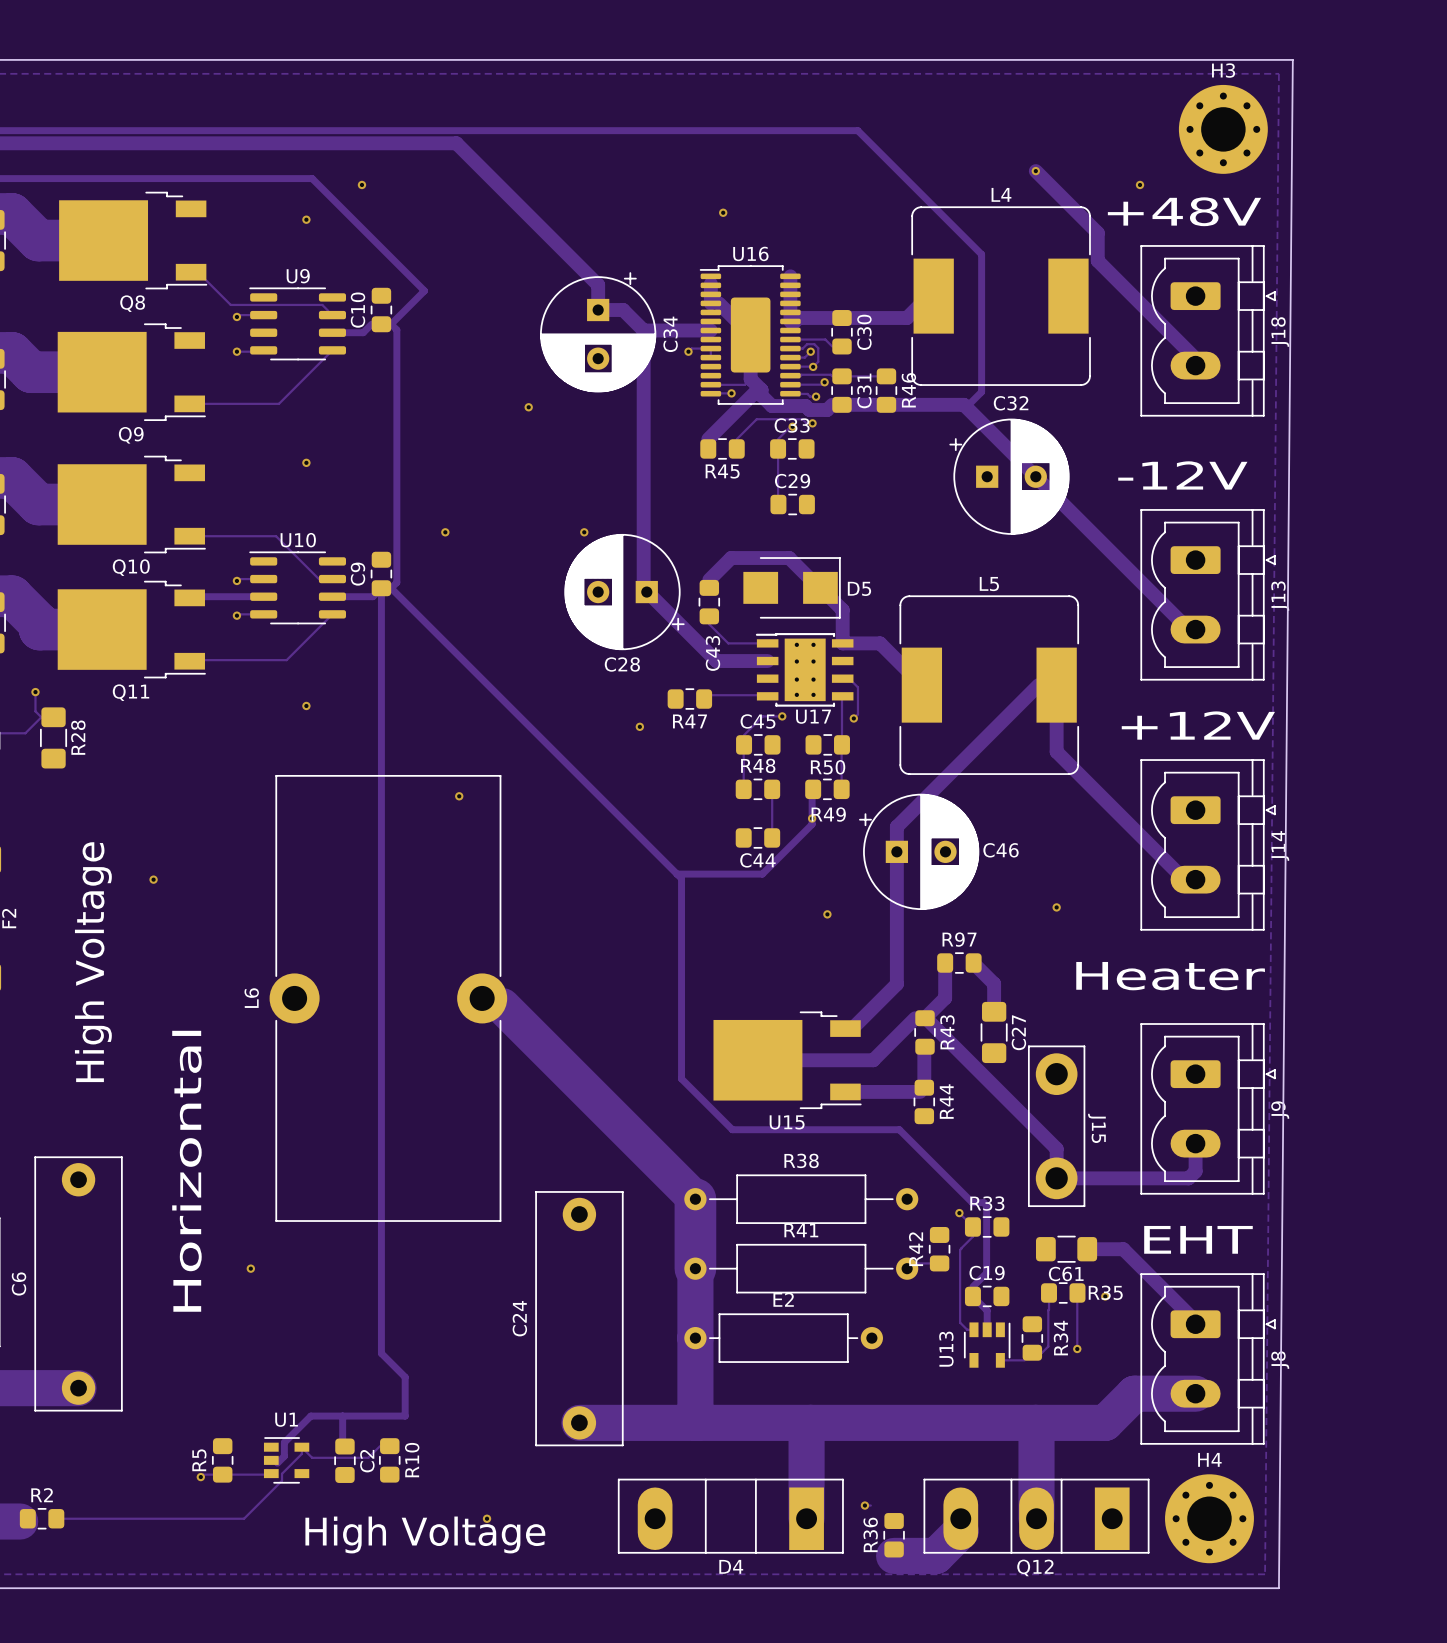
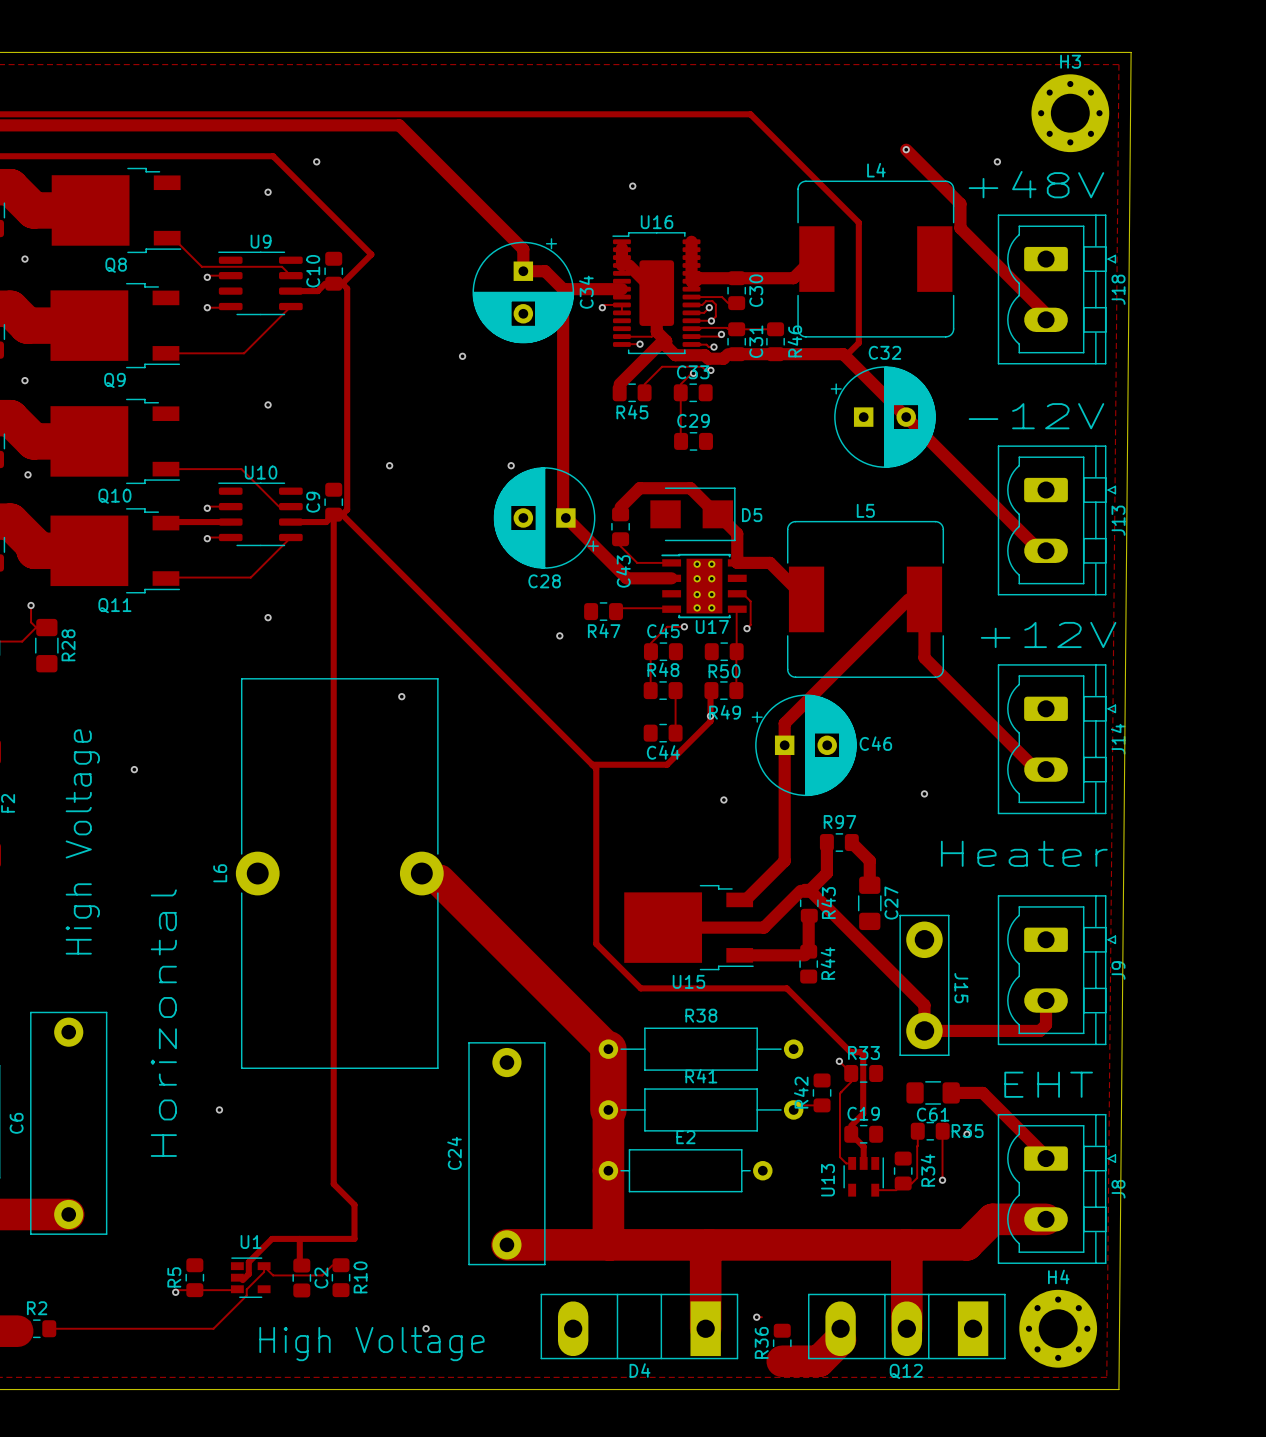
via: none -> (24, 259)
via: none -> (24, 380)
via: none -> (28, 474)

